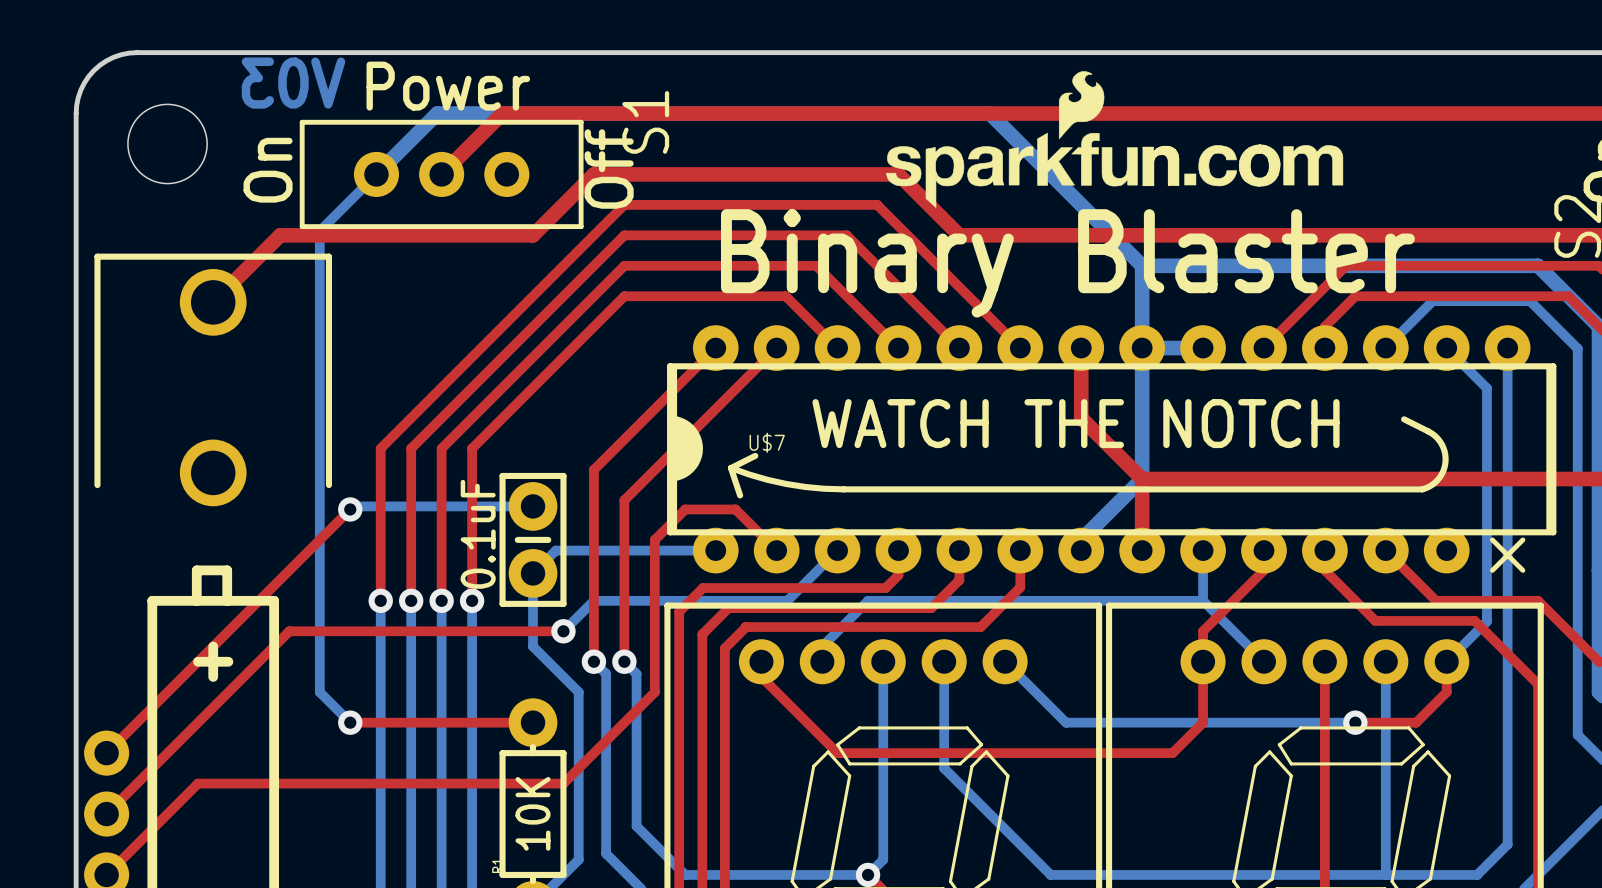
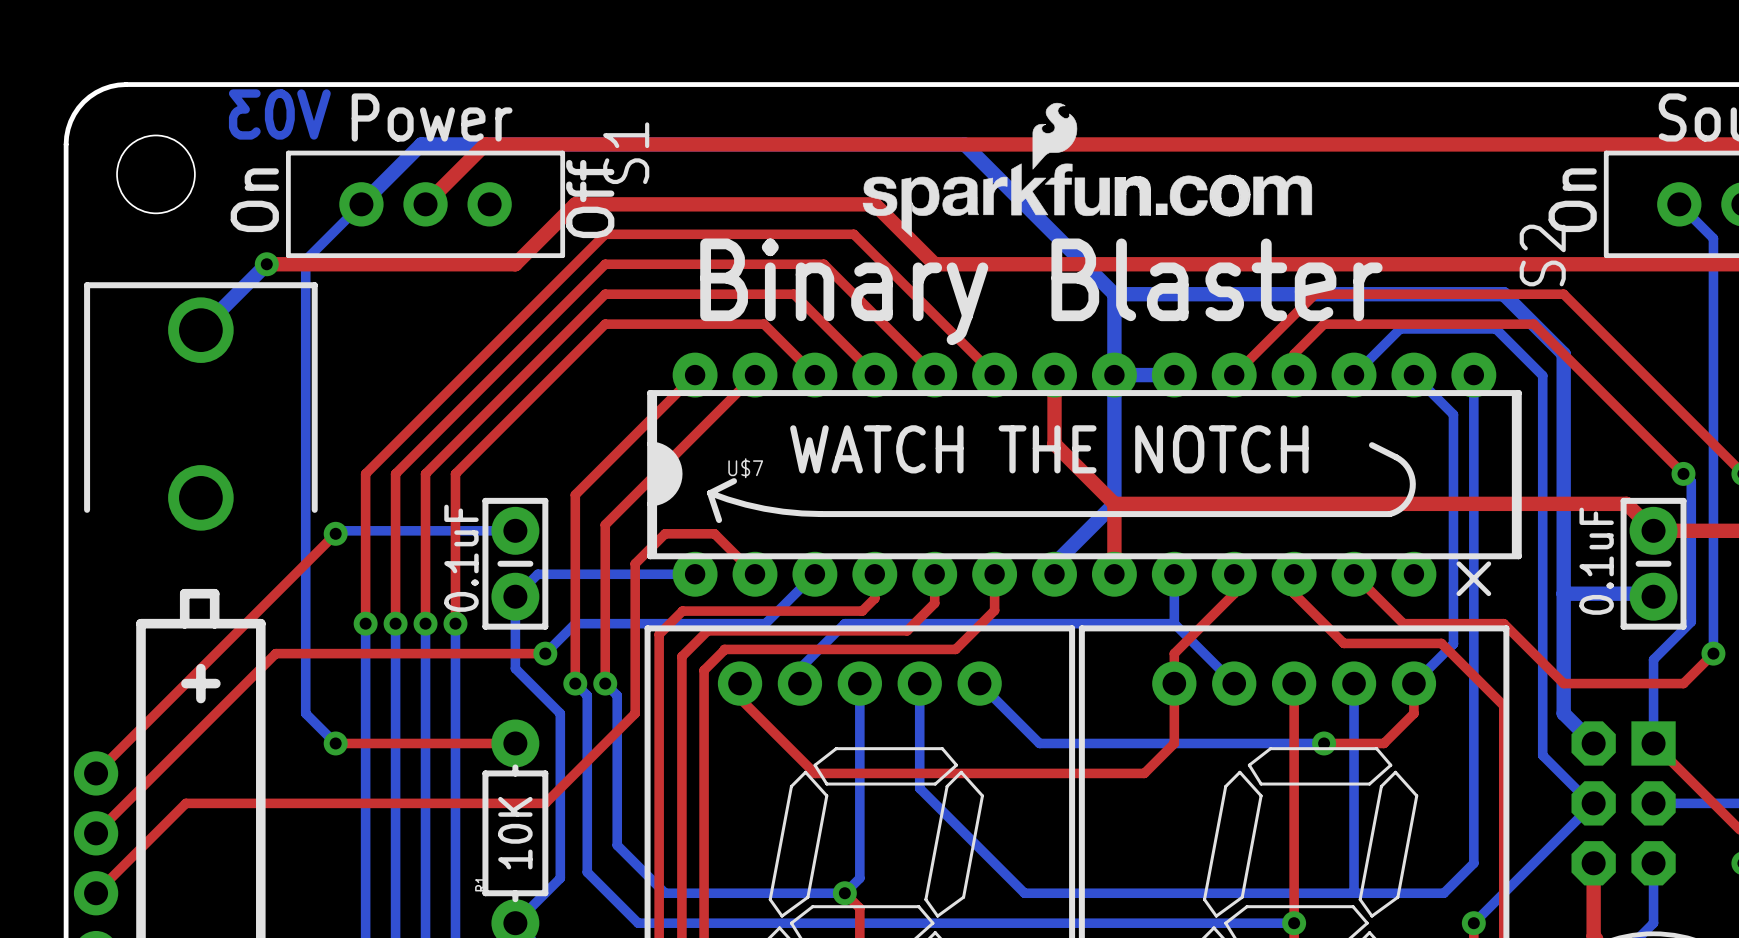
top track: (280, 235) (213, 302) -> none
bottom track: none -> (266, 264) (200, 330)
via: none -> (266, 264)

